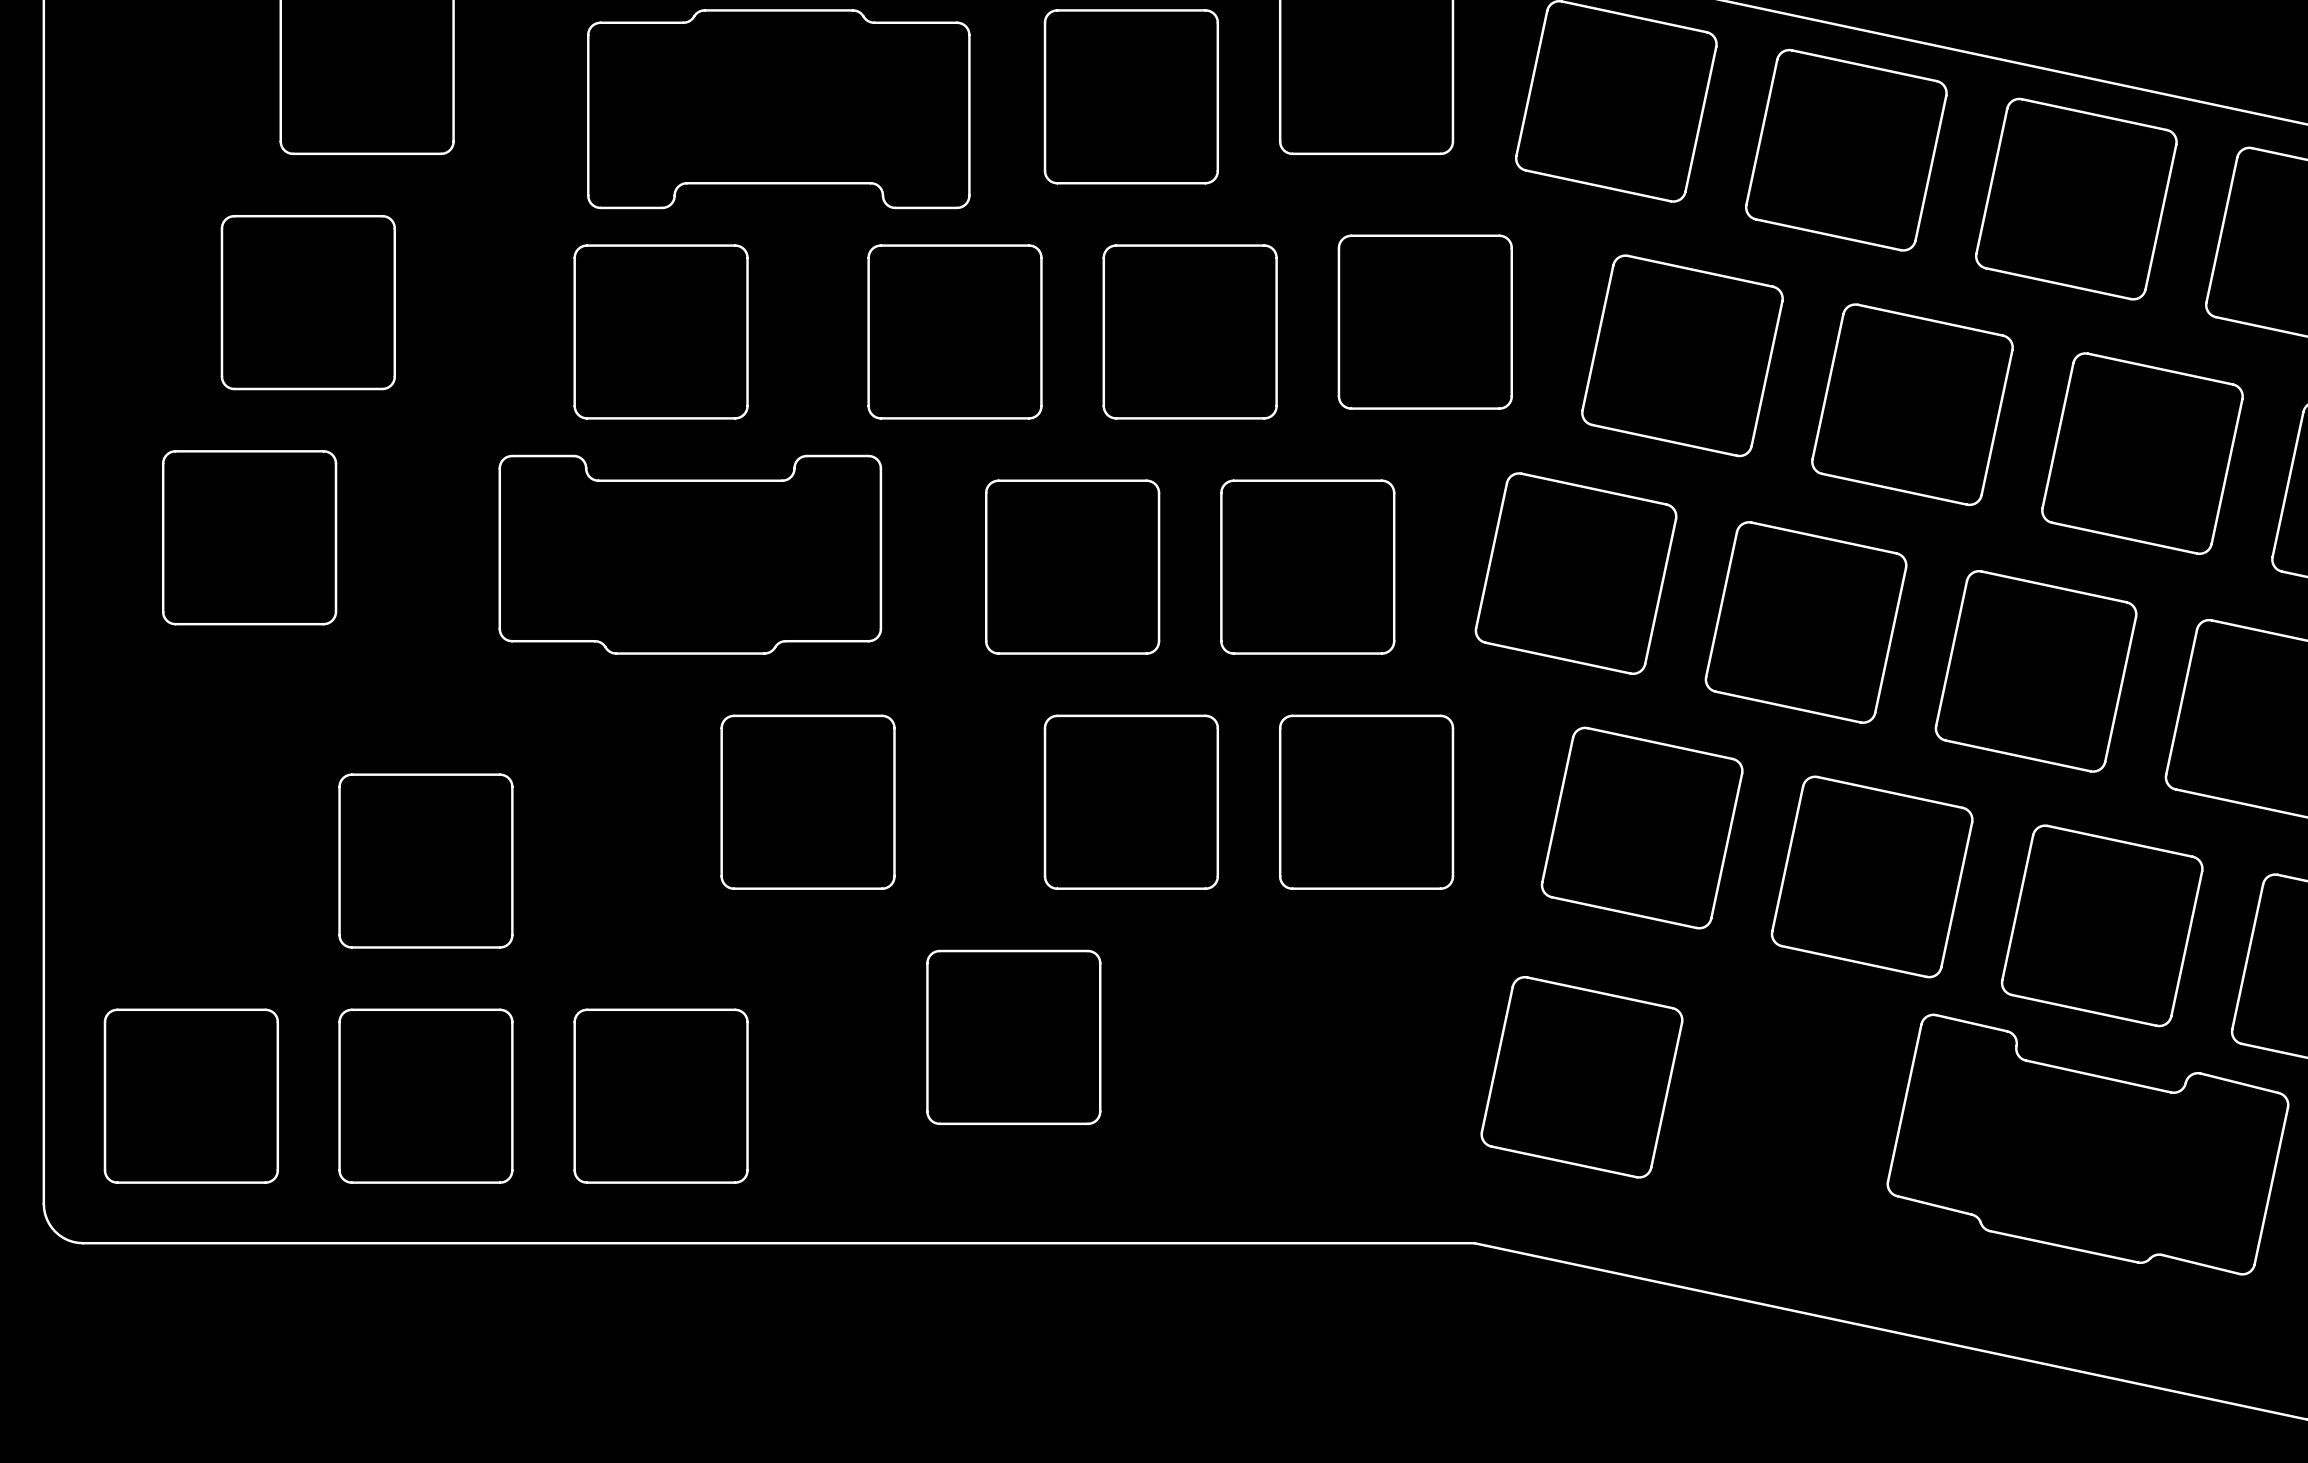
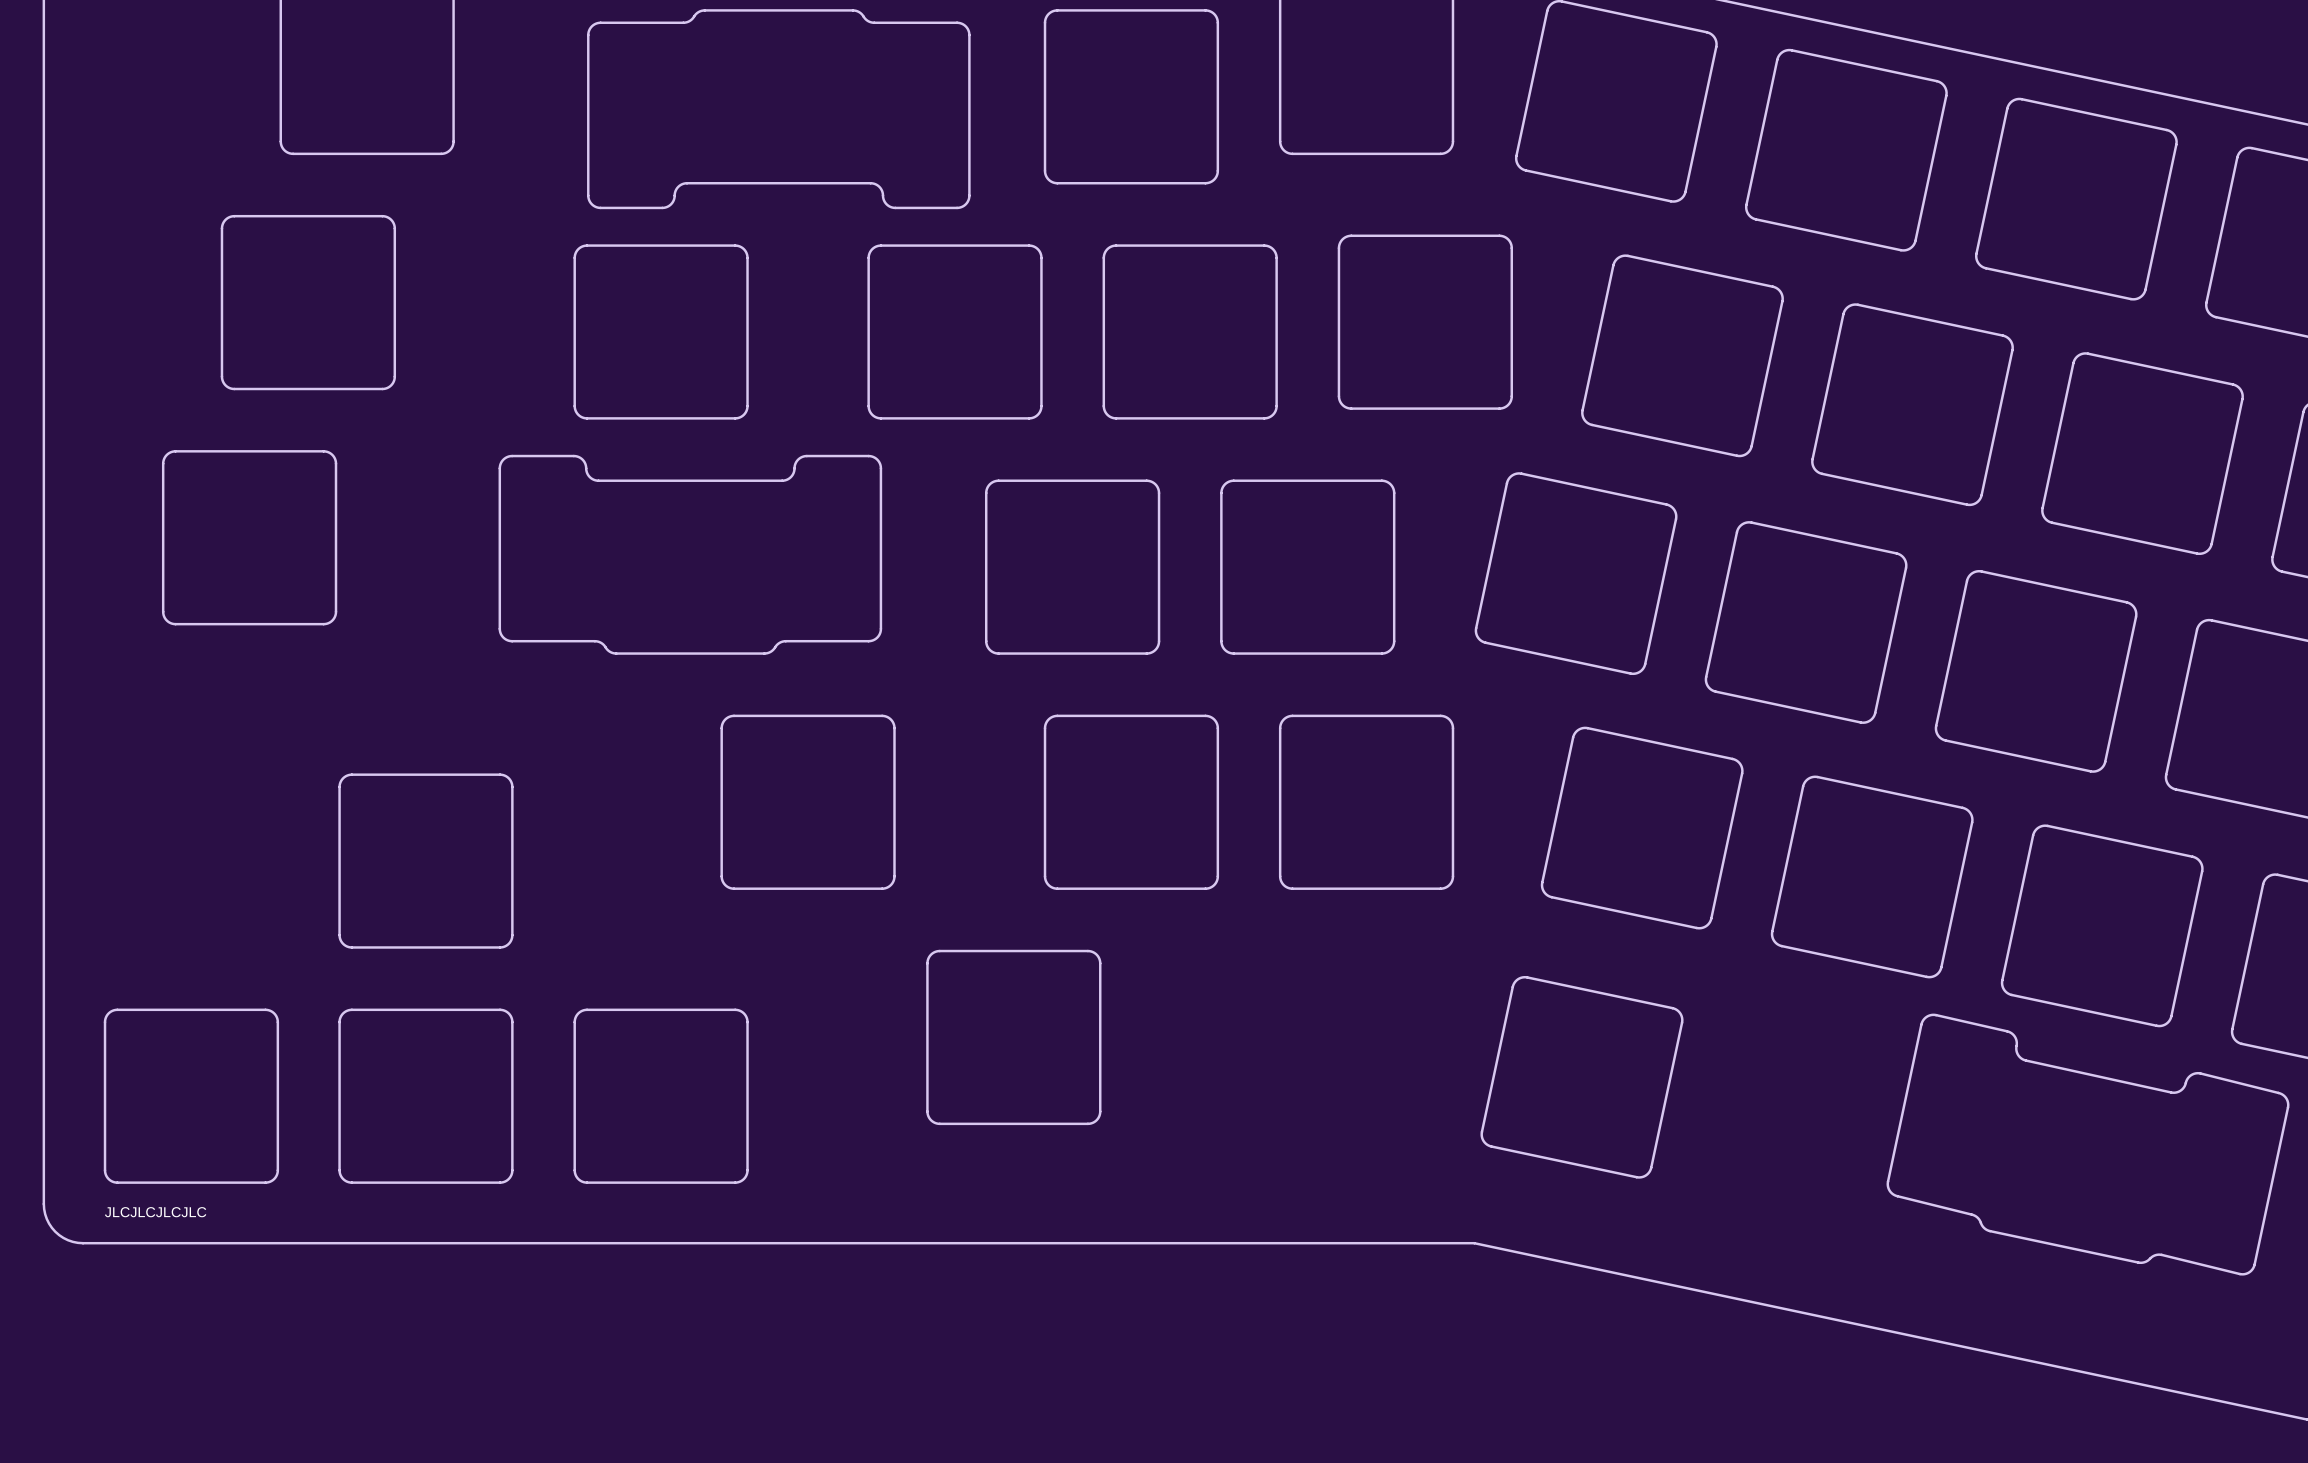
text: none -> JLCJLCJLCJLC (155, 1212)

